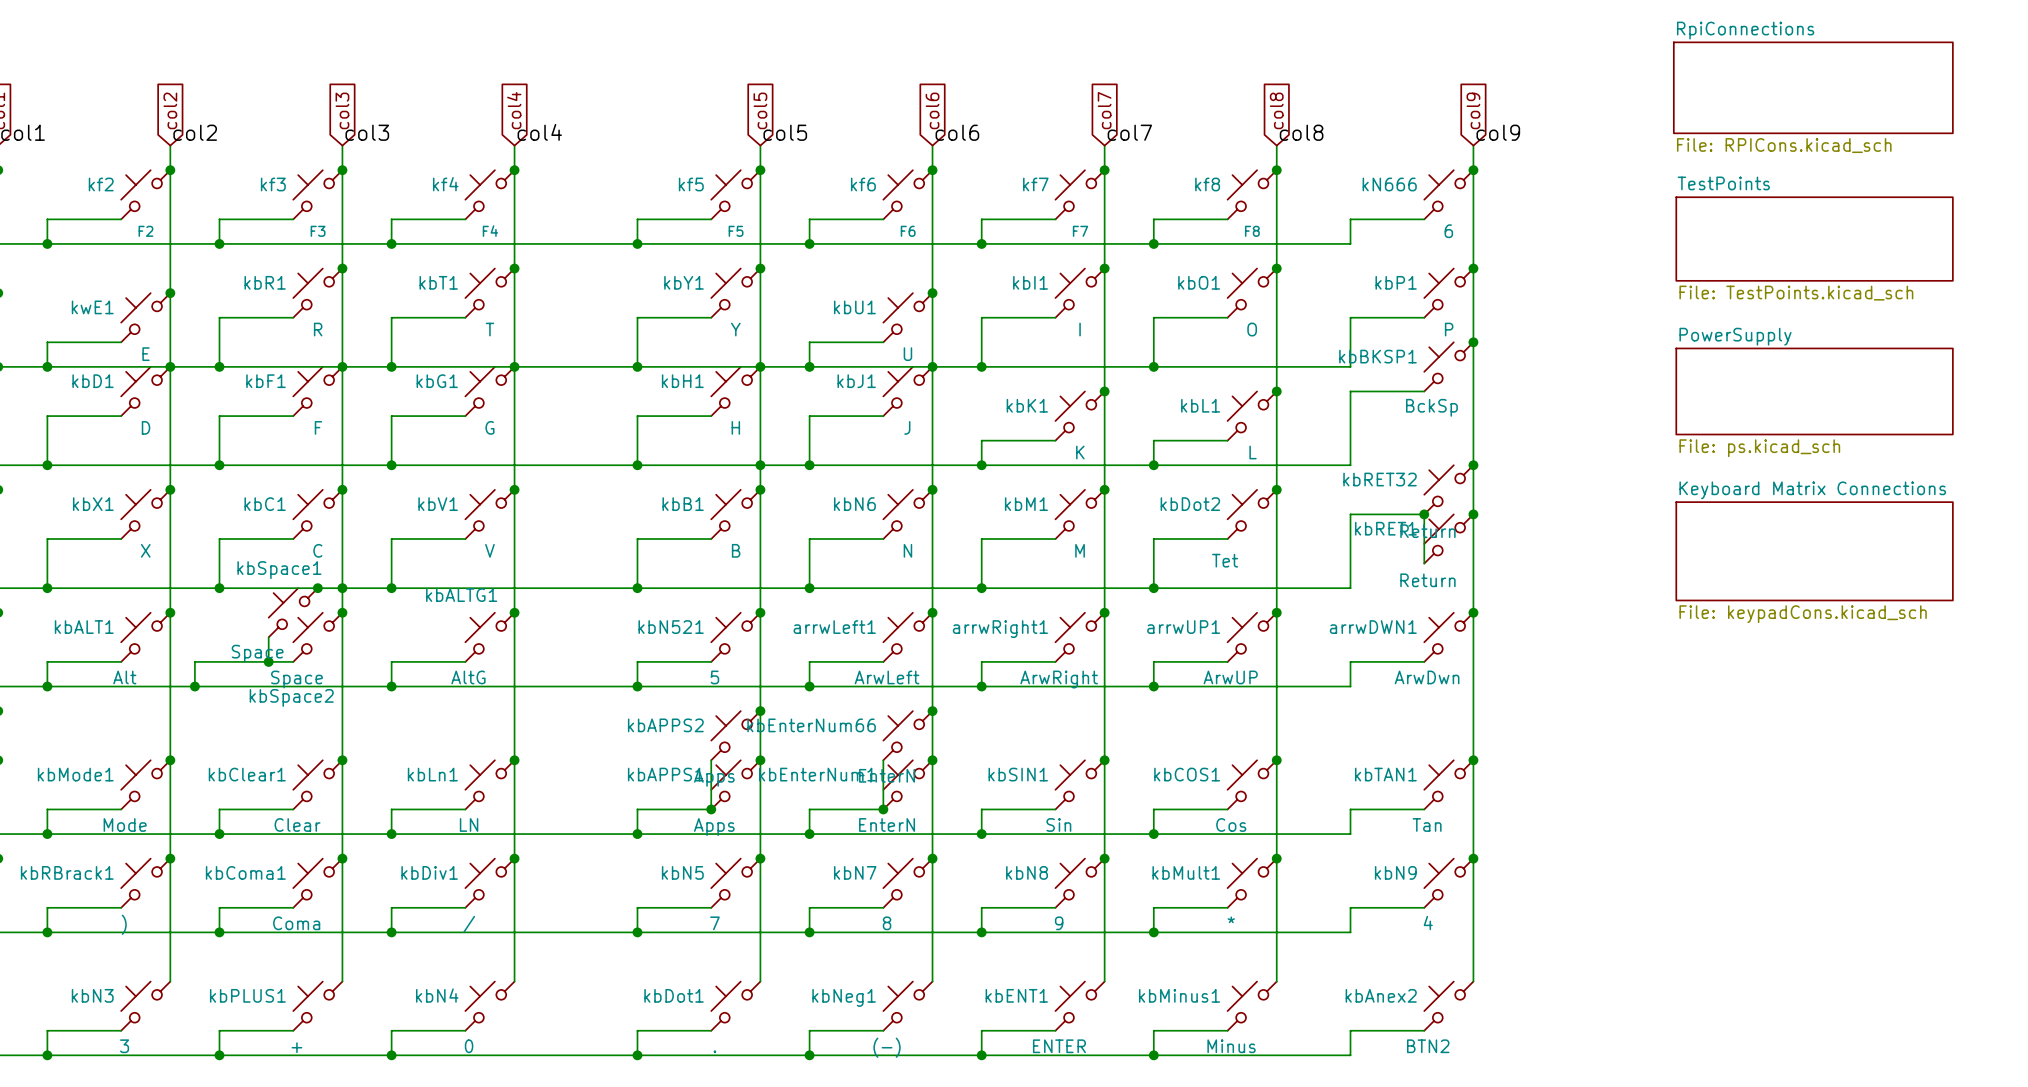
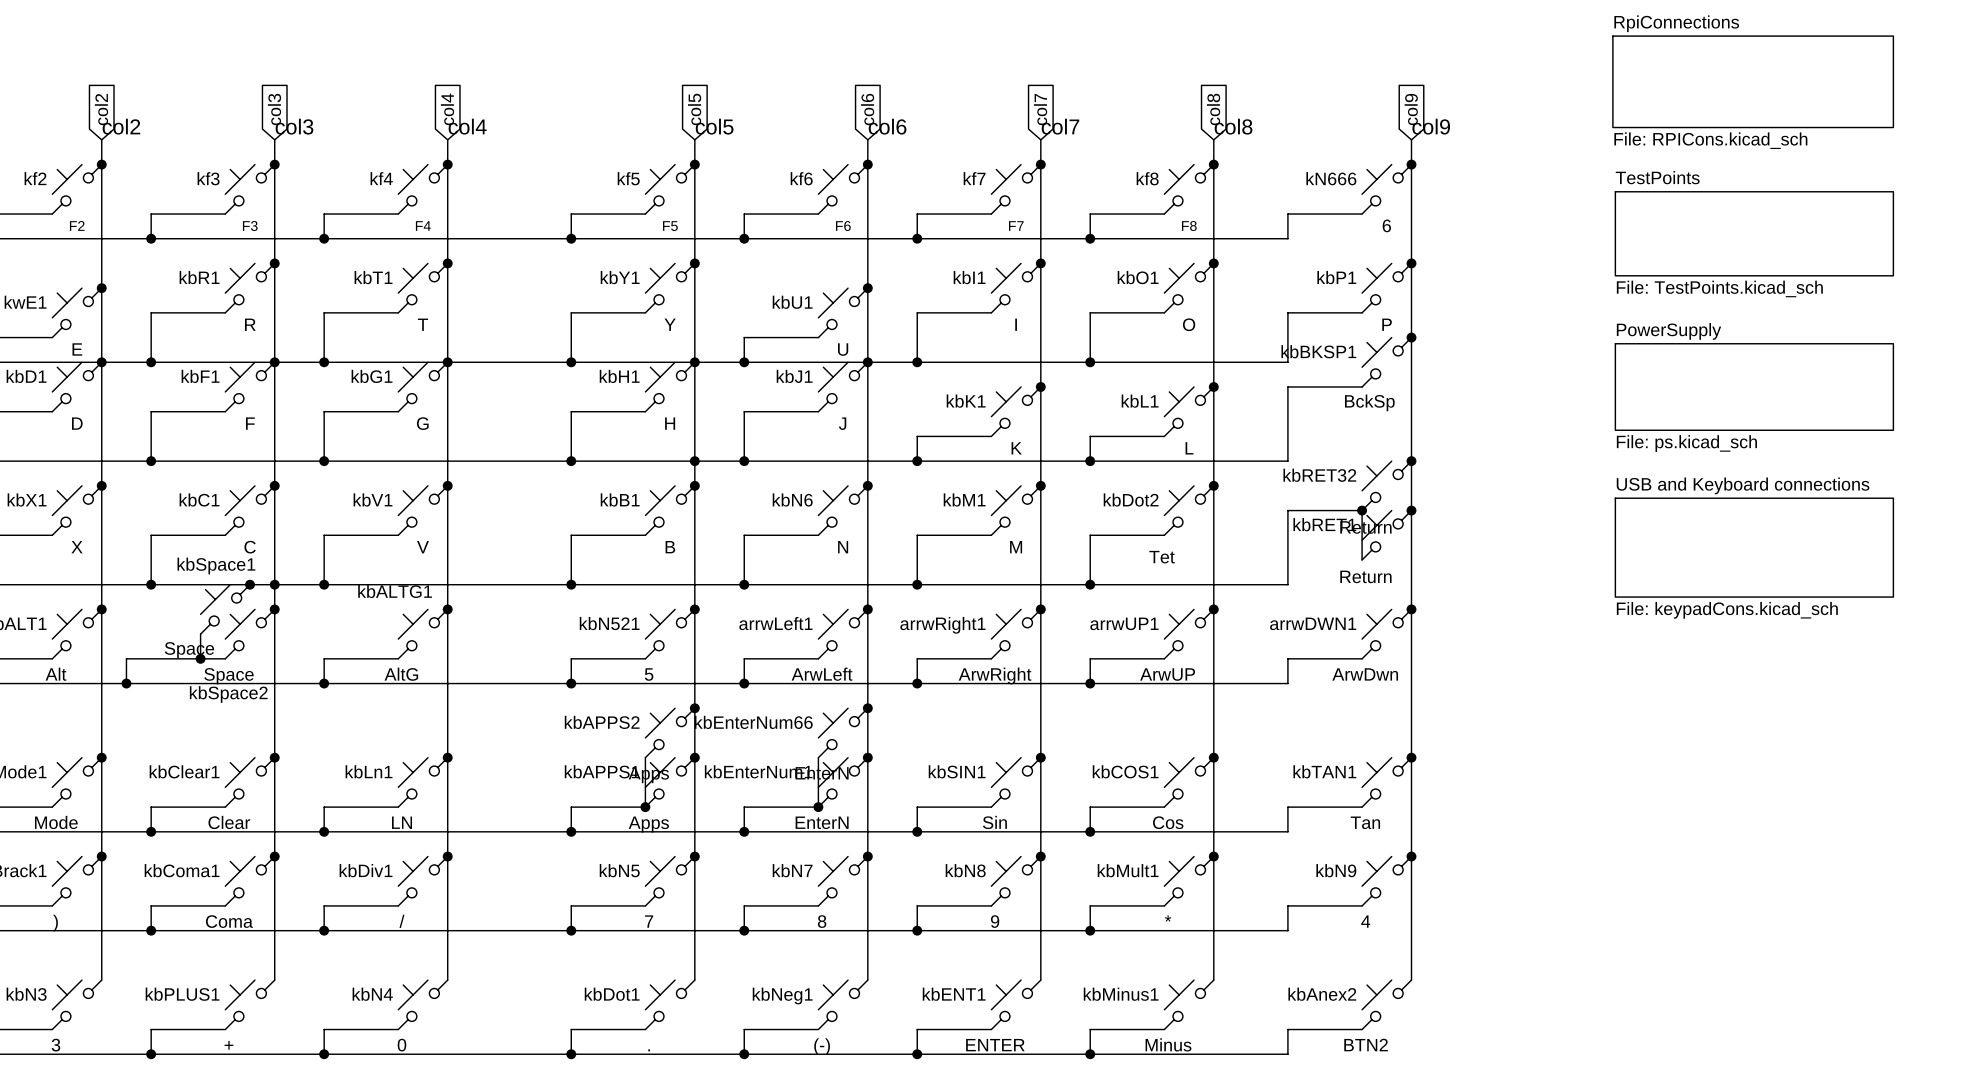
sheet Keyboard Matrix Connections name: Keyboard Matrix Connections (1812, 490) -> USB and Keyboard connections (1743, 485)

